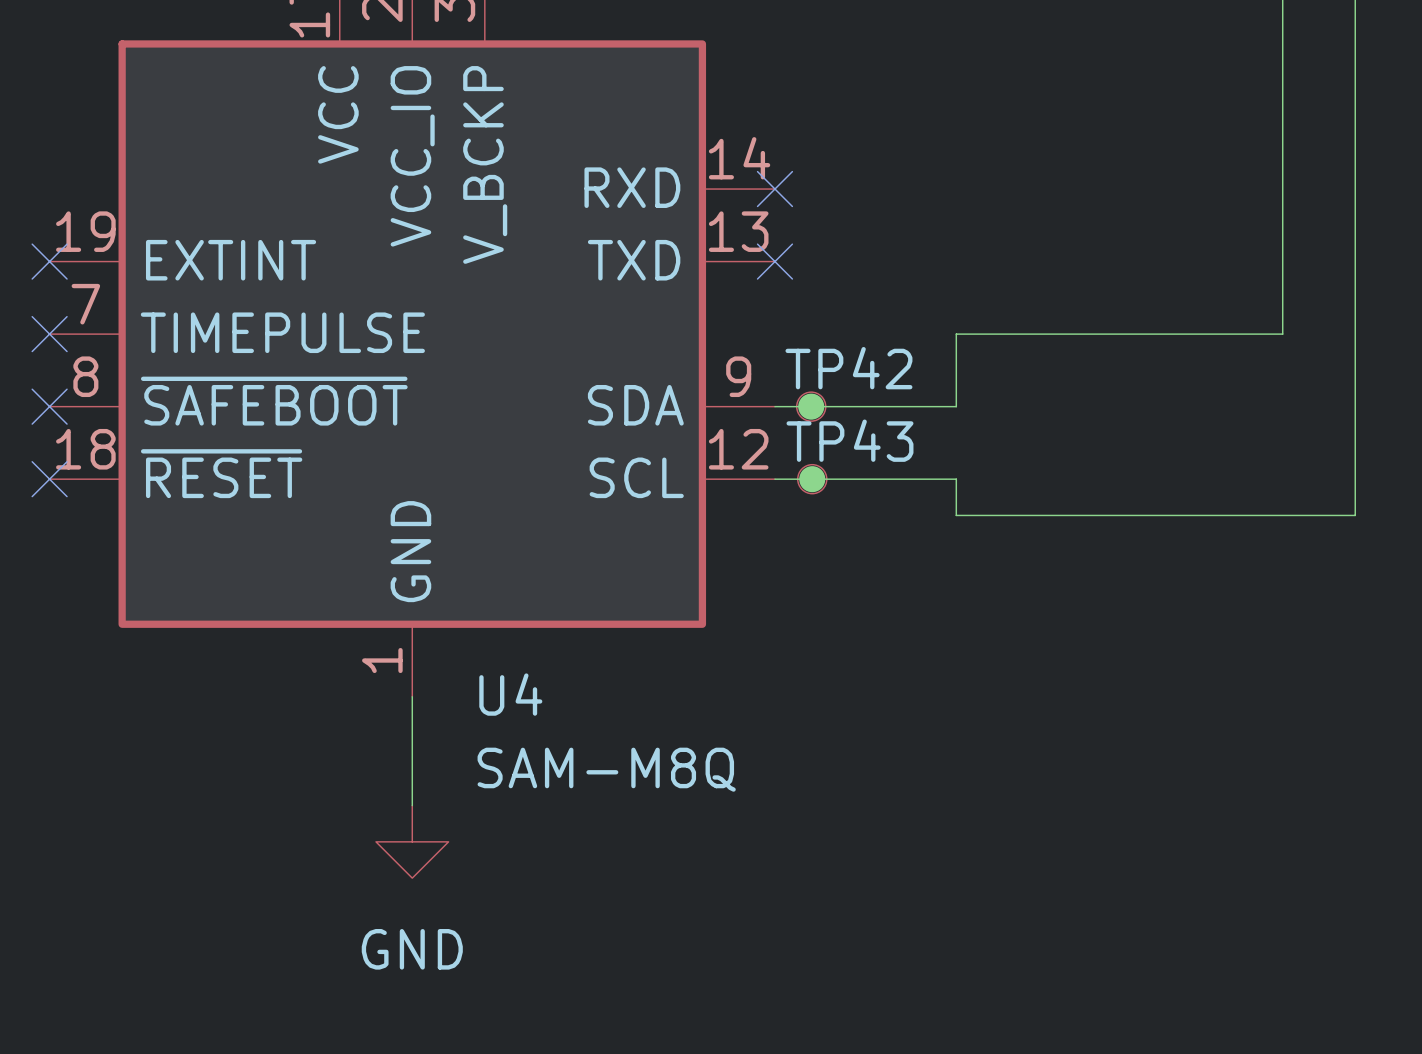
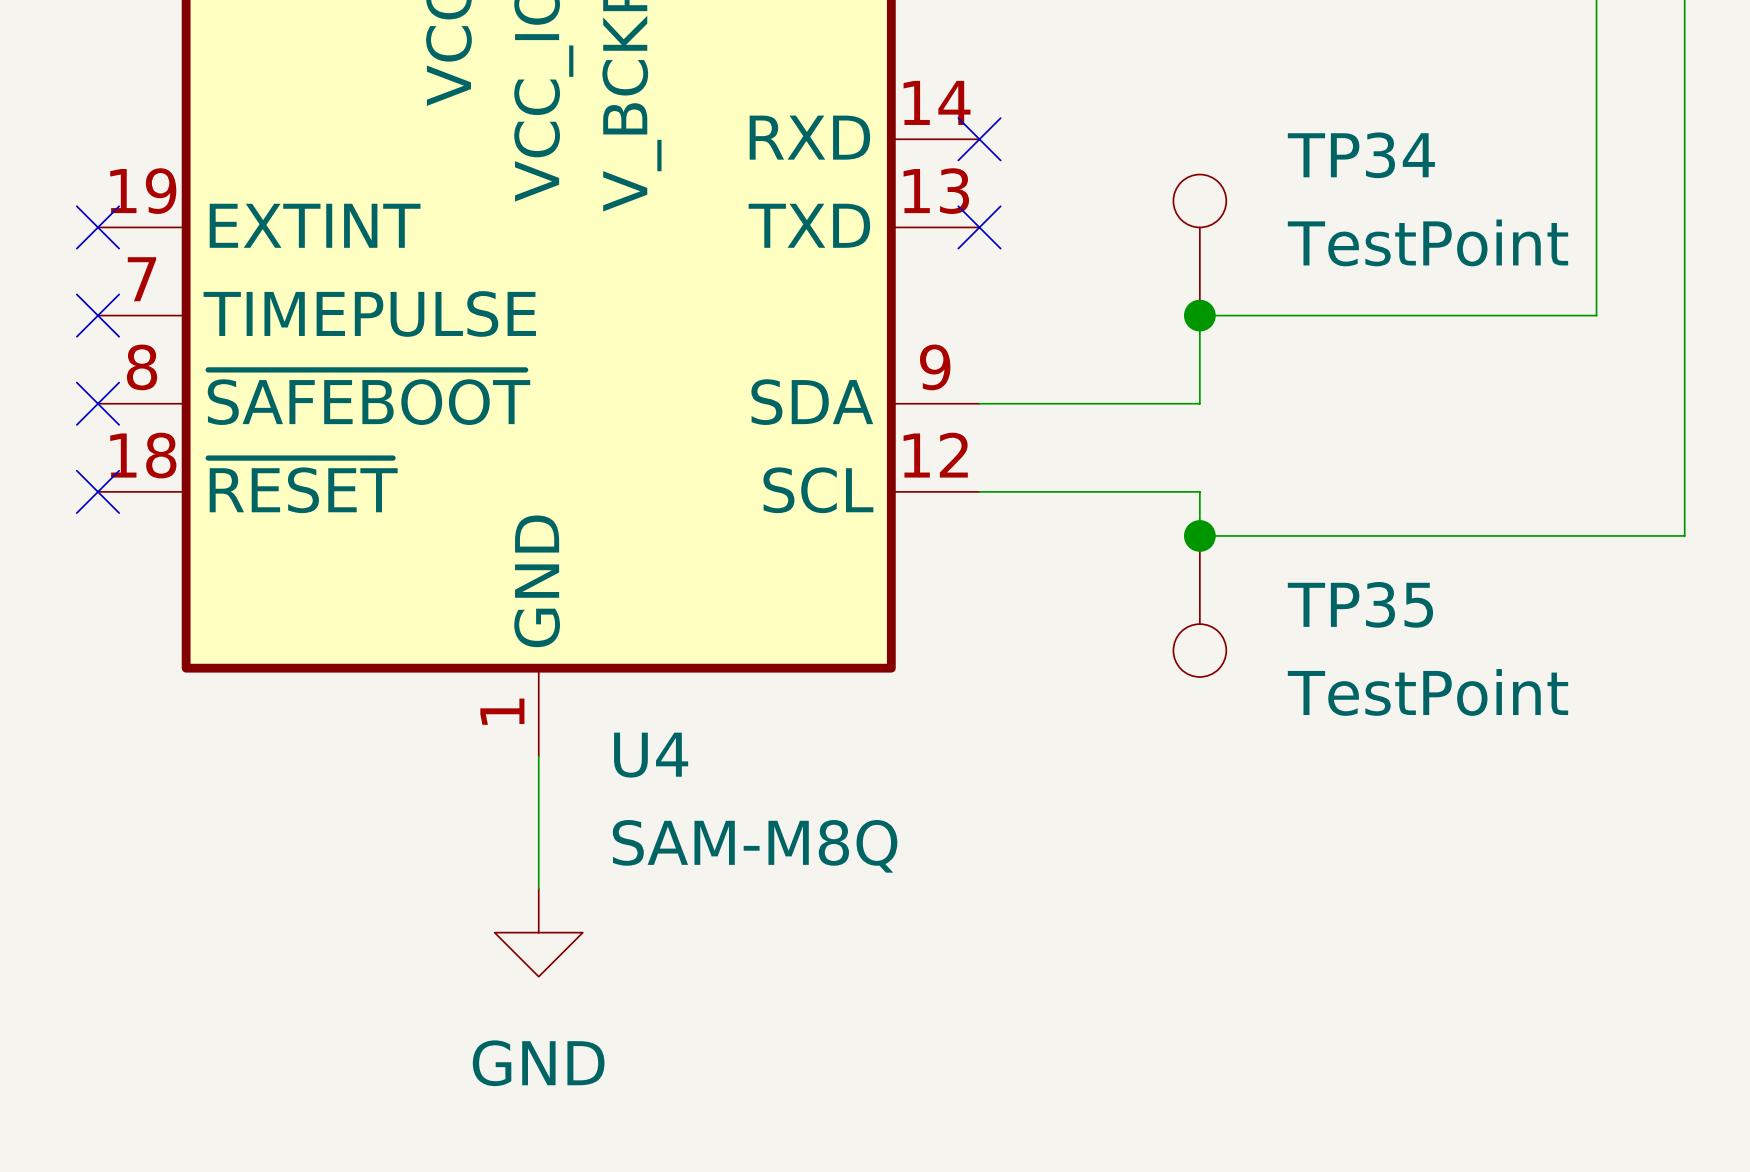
TP34: none -> TestPoint (1199, 245)
junction: none -> (1199, 315)
junction: (811, 406) -> none
TP42: (811, 406) -> none
junction: (812, 479) -> none
TP43: (812, 479) -> none
junction: none -> (1199, 535)
TP35: none -> TestPoint (1199, 606)

